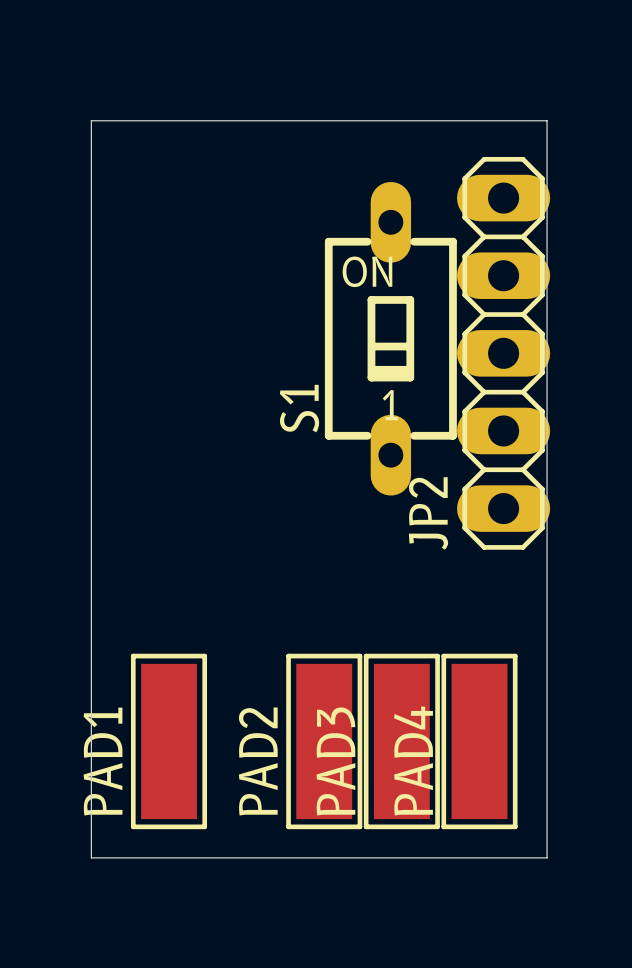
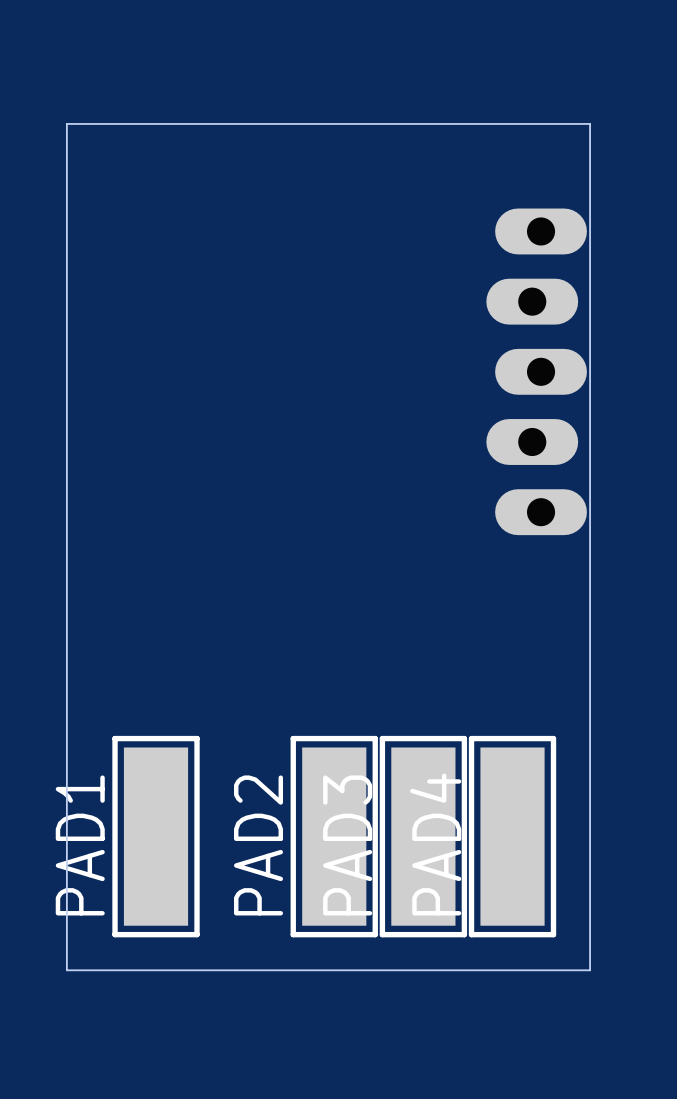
part: none -> (536, 371)
S1: (390, 338) -> none
JP2: (503, 353) -> none

